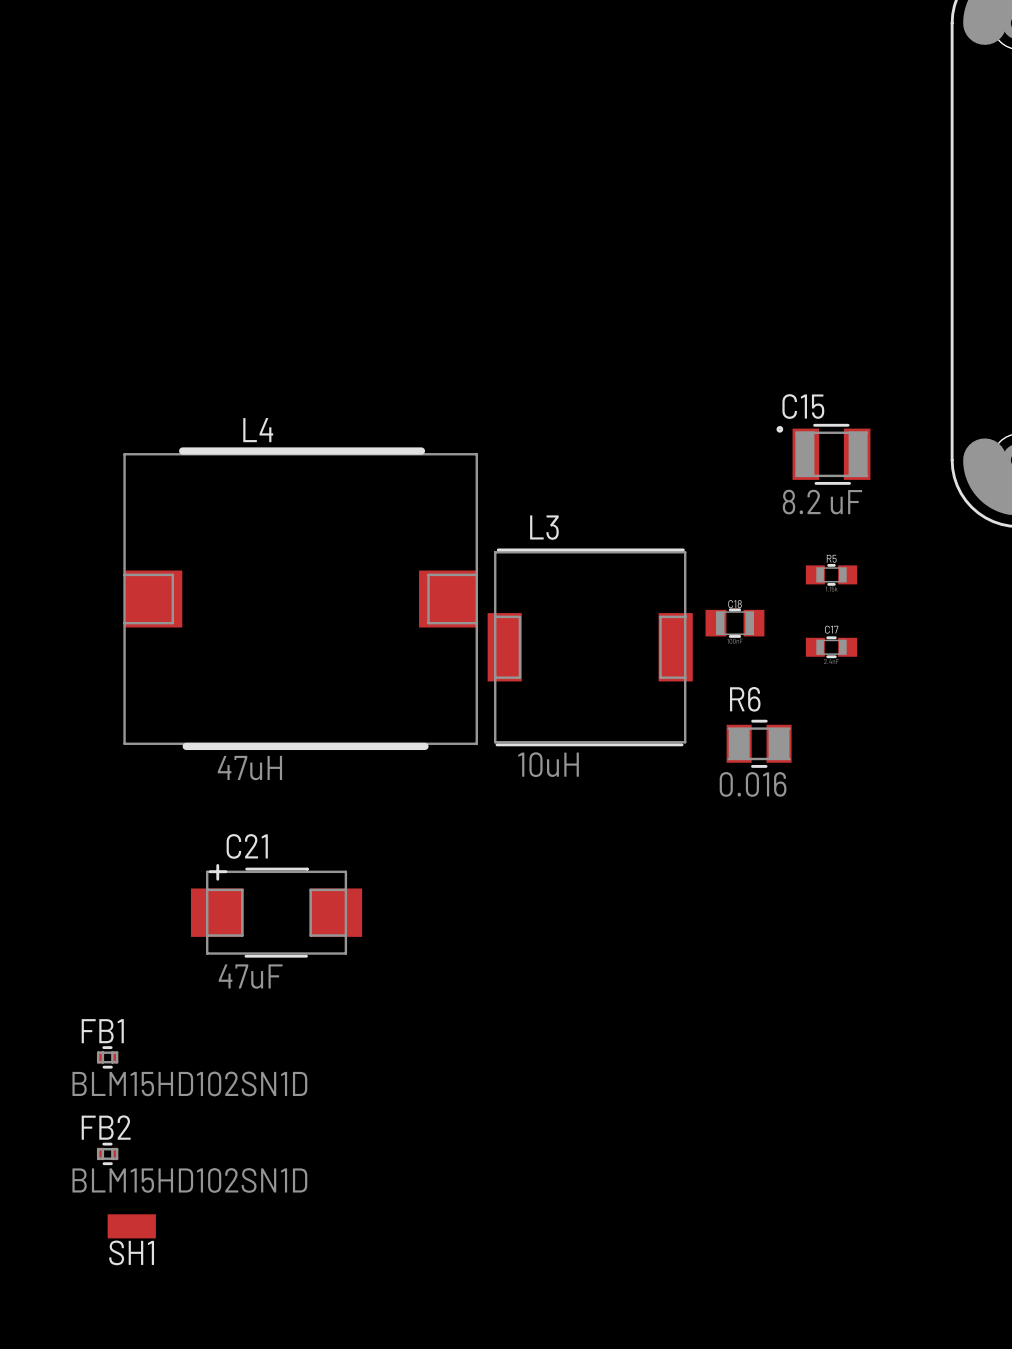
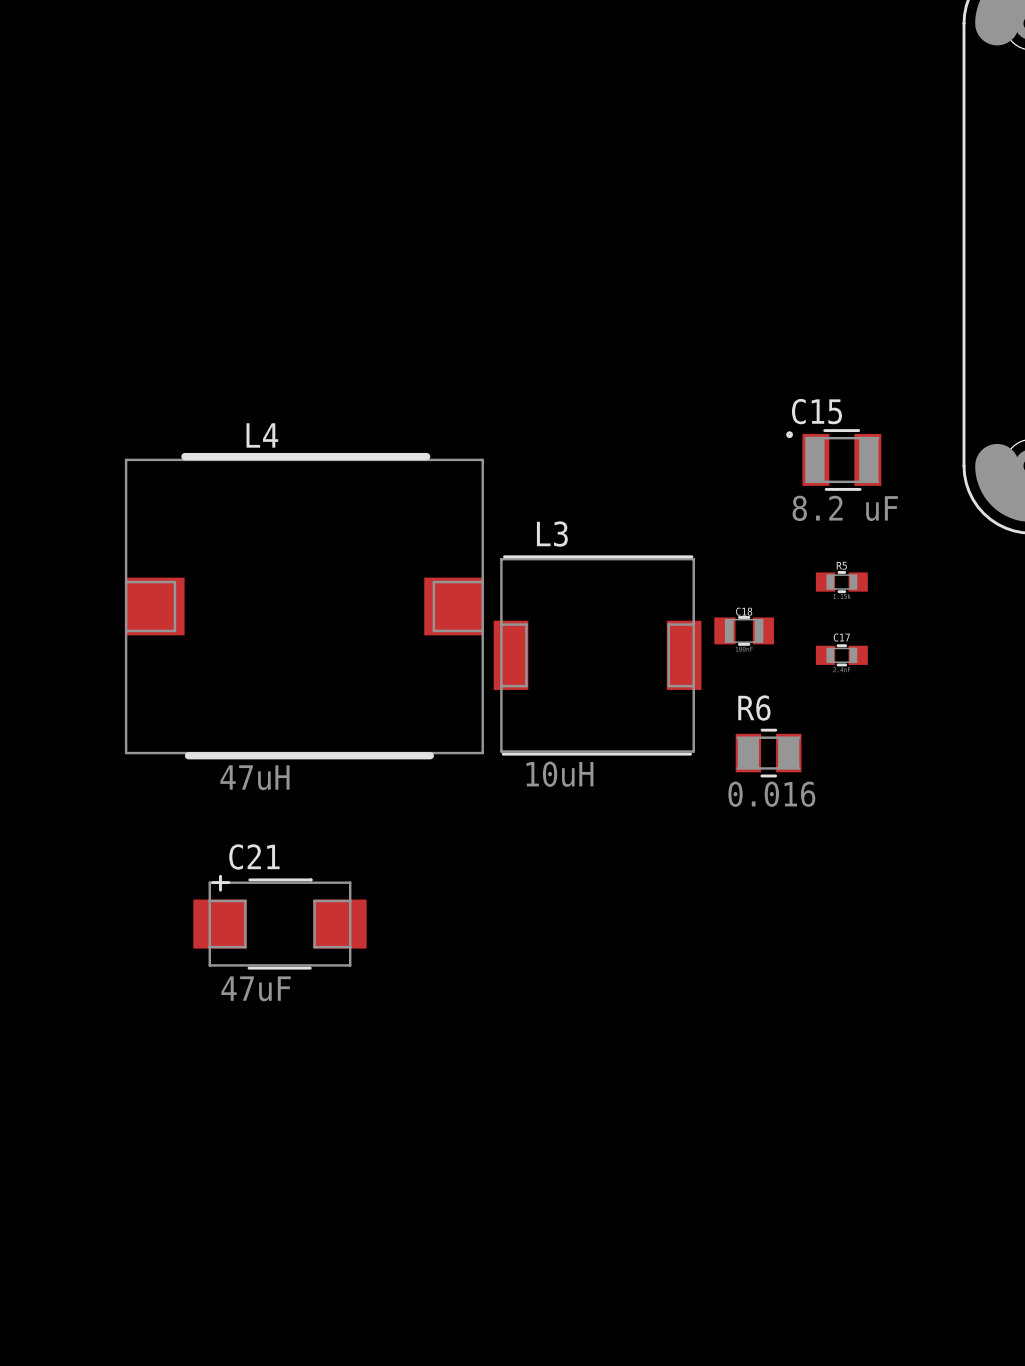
FB1: BLM15HD102SN1D (107, 1057) -> none
FB2: BLM15HD102SN1D (107, 1153) -> none
SH1: (131, 1226) -> none

